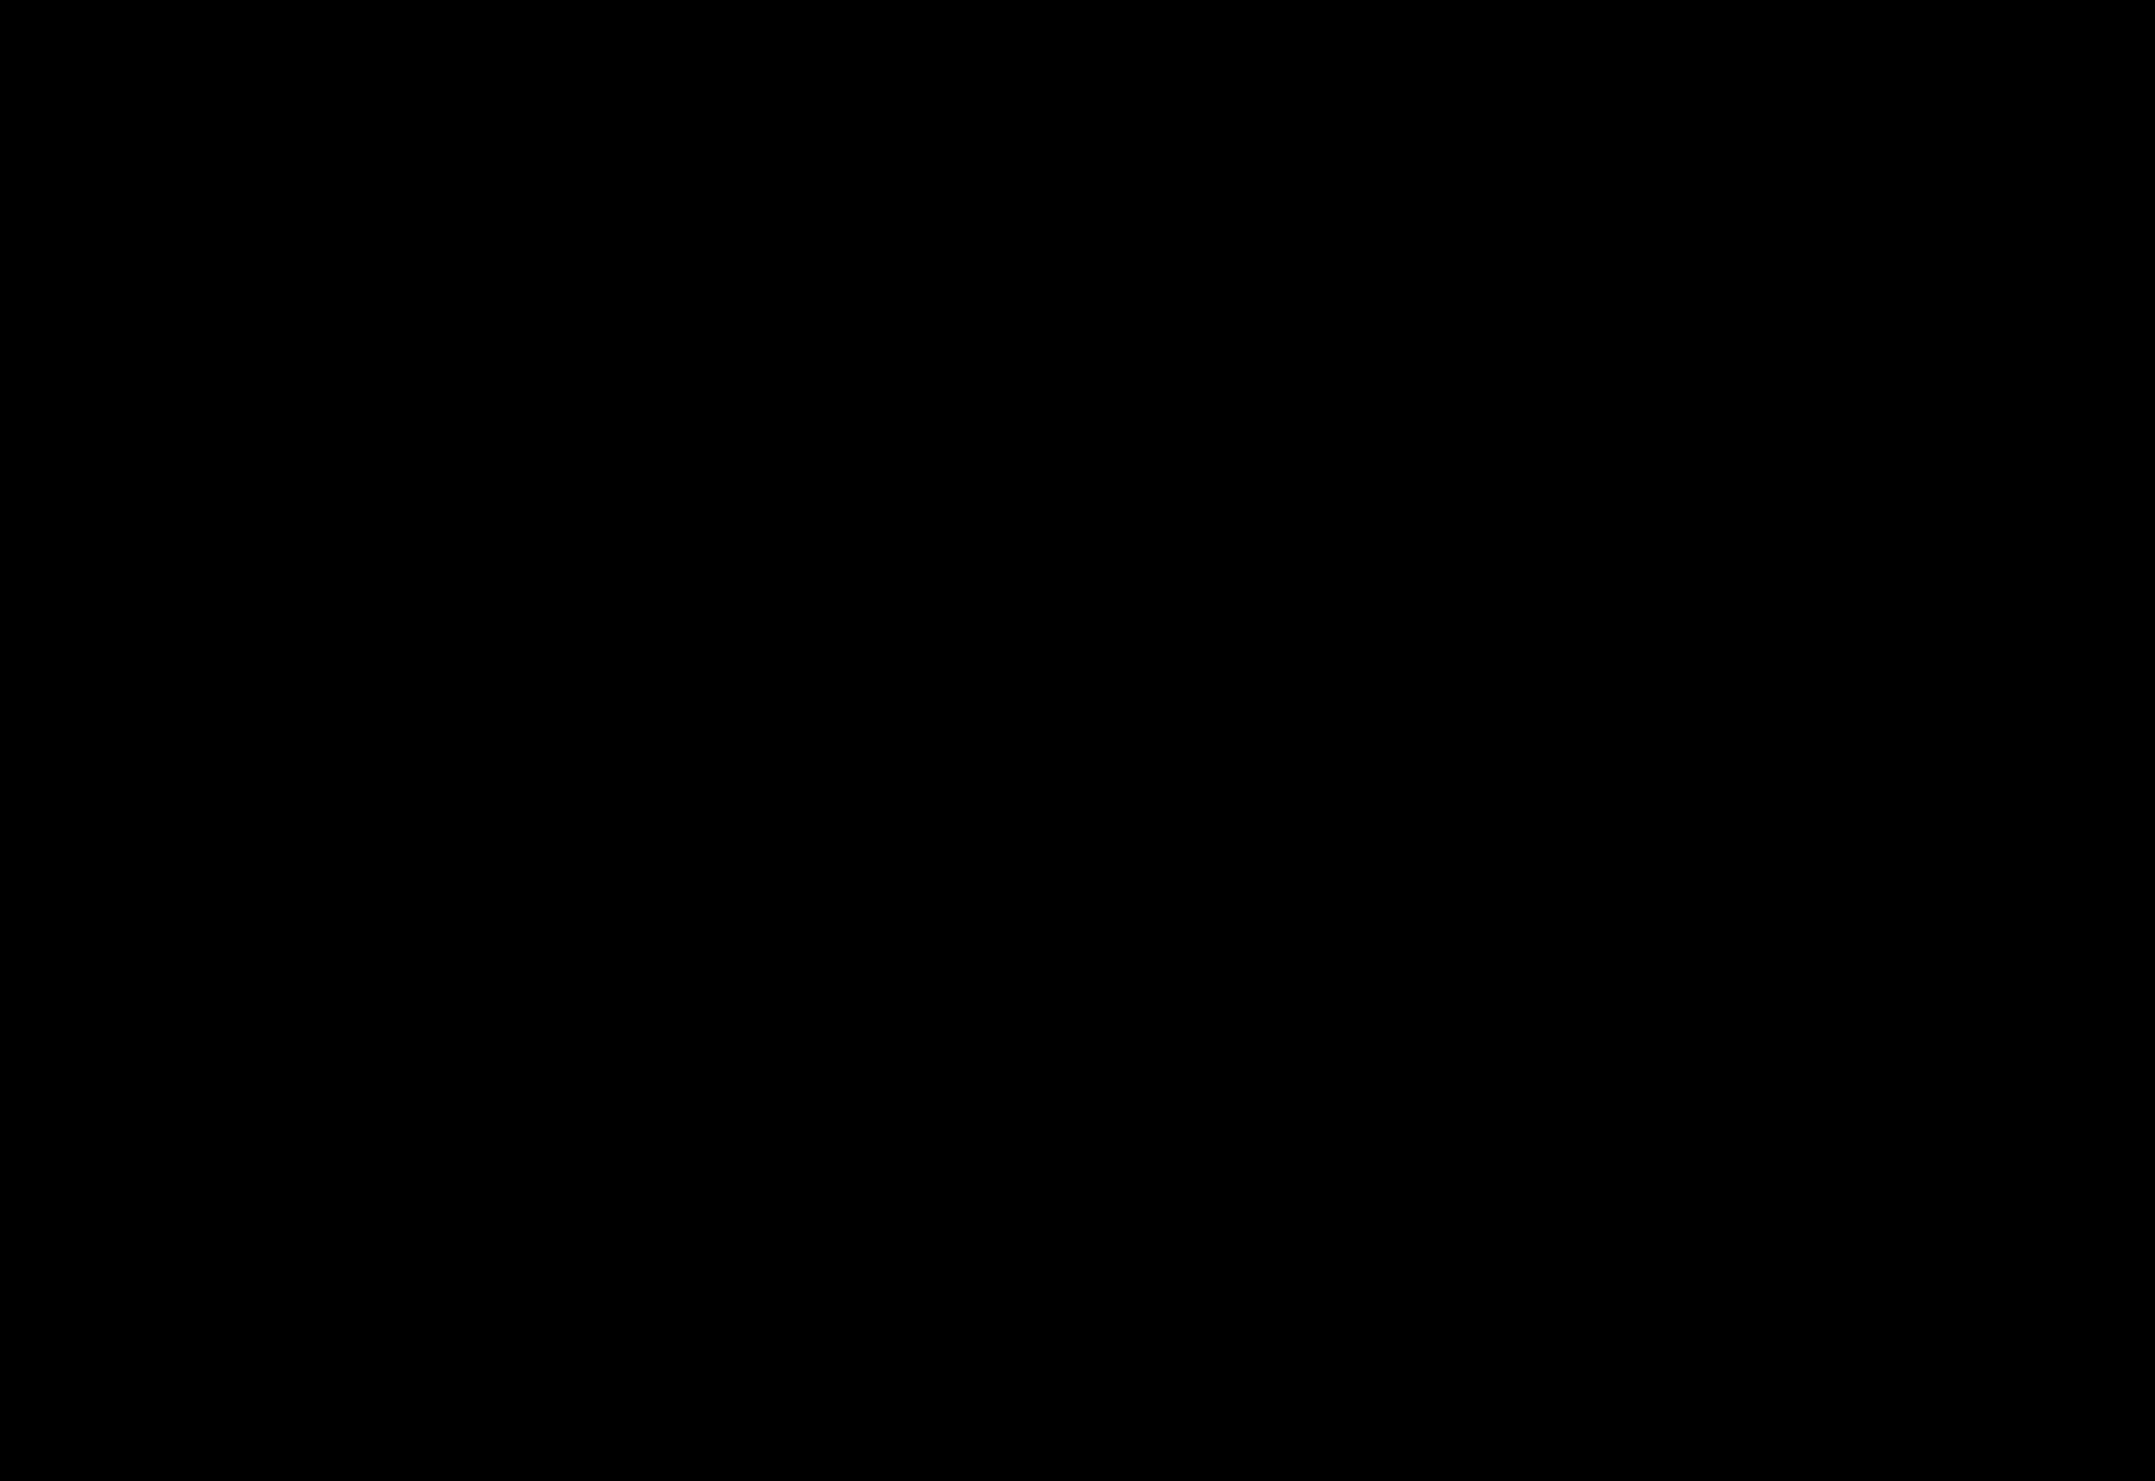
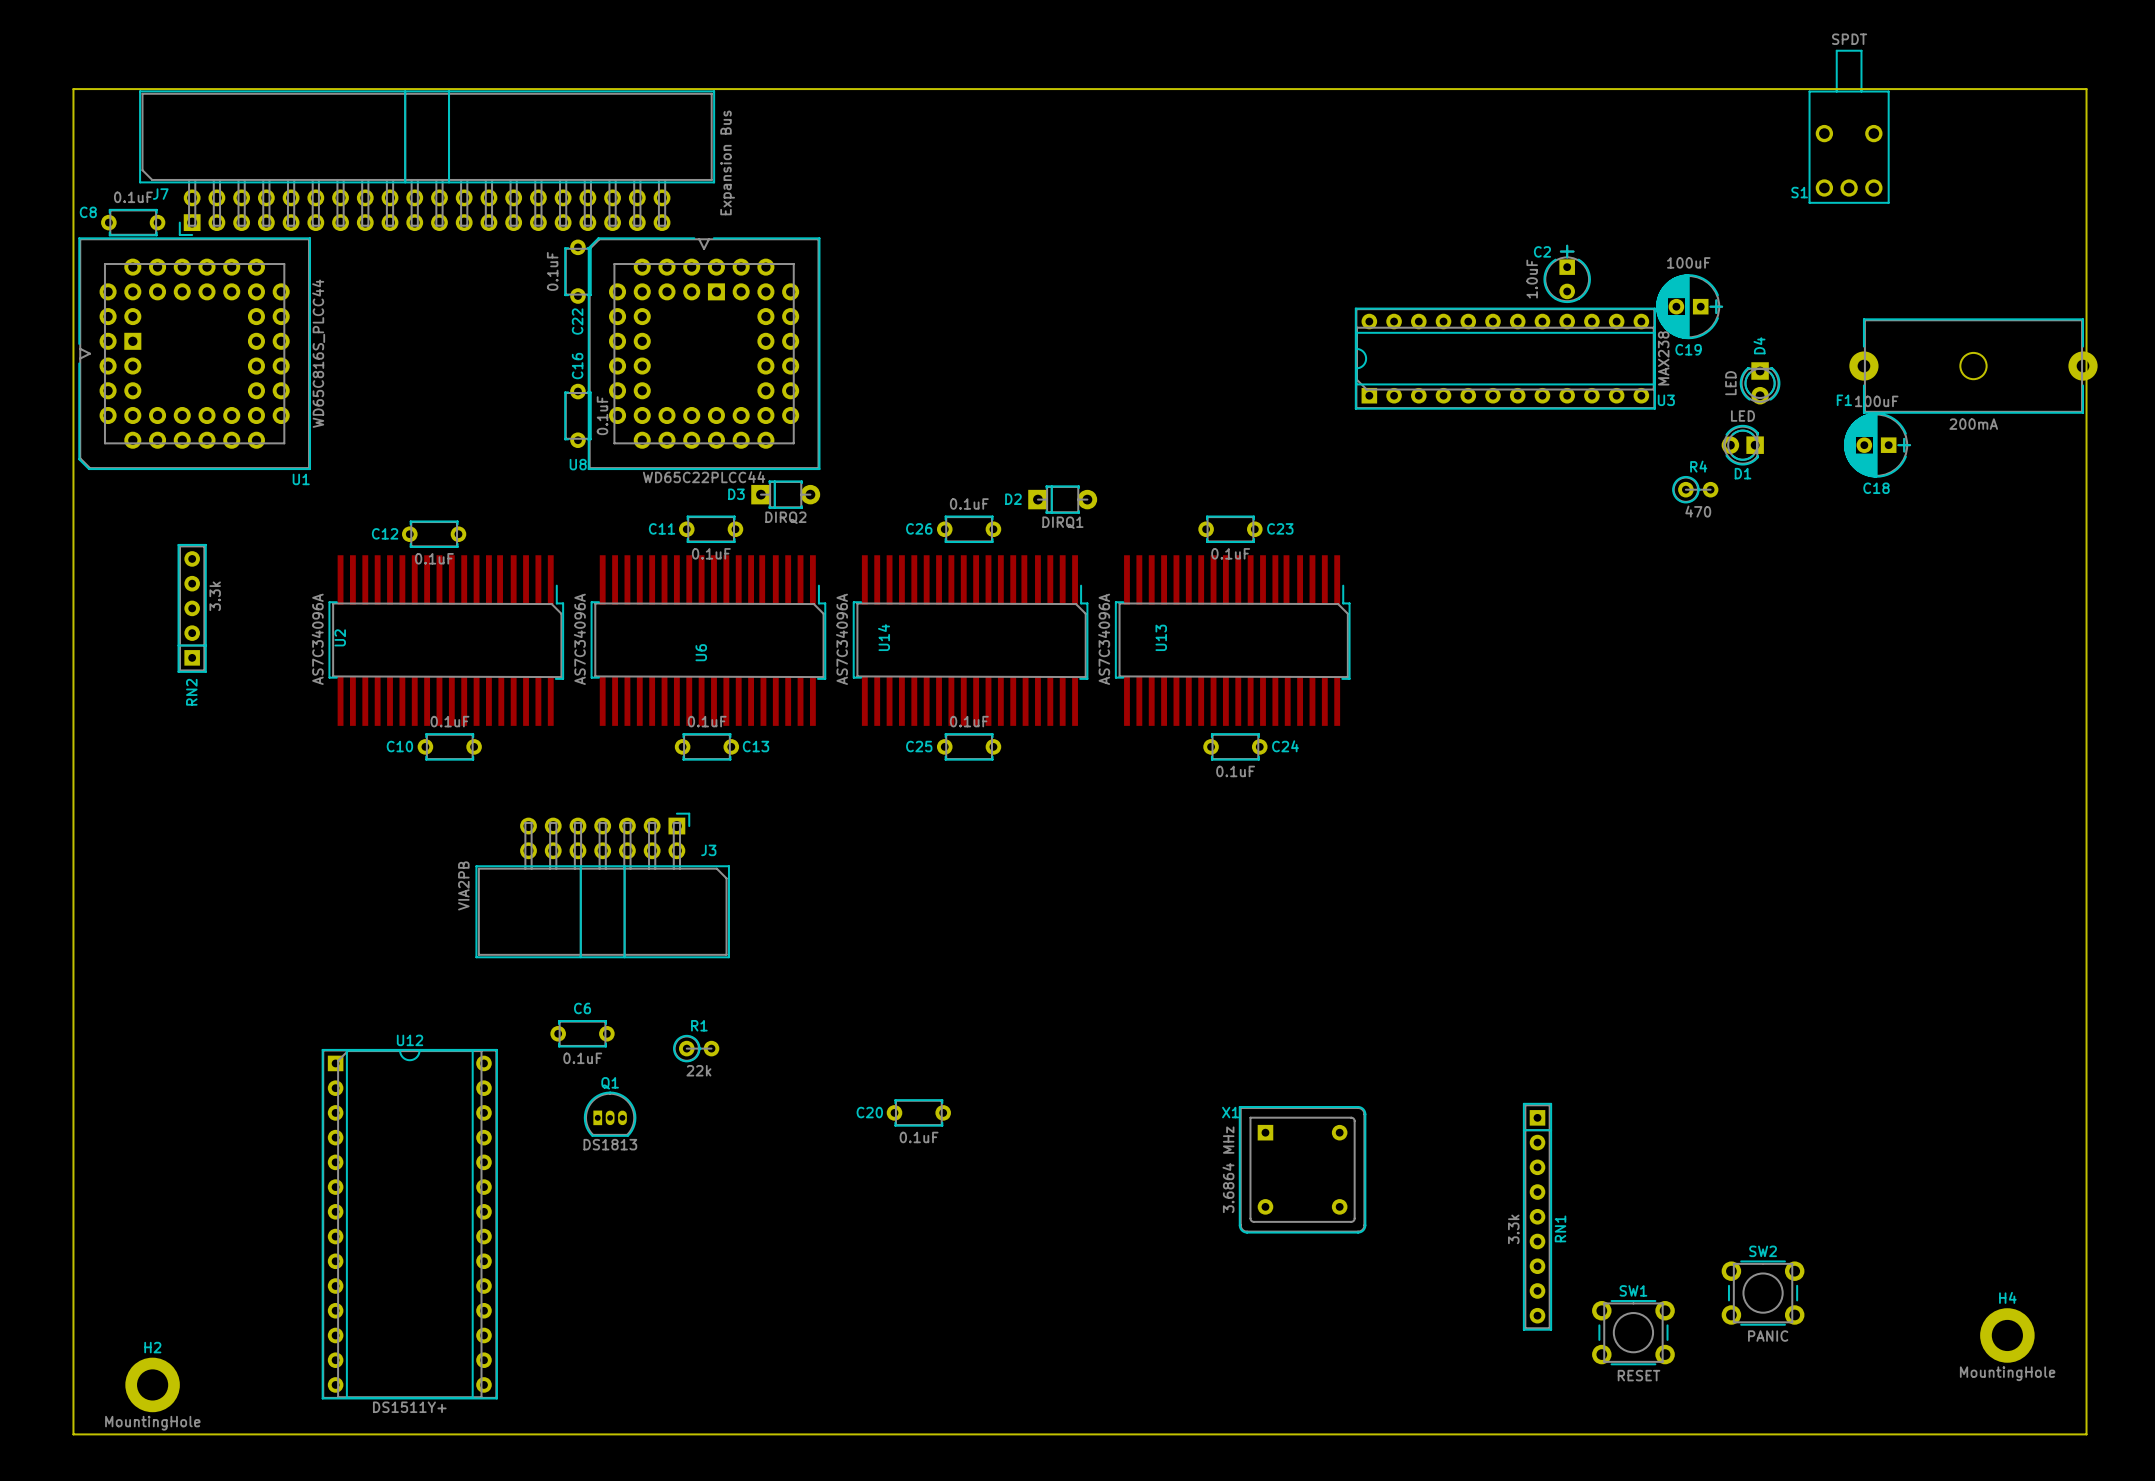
board edge: none -> (73, 89) (73, 1434) (2086, 1434) (2086, 89) (73, 89)
S1: none -> SPDT (1849, 126)
J7: none -> Expansion Bus (427, 163)
C8: none -> 0.1uF (133, 222)
C22: none -> 0.1uF (577, 271)
C2: none -> 1.0uF (1567, 273)
C19: none -> 100uF (1689, 306)
U1: none -> WD65C816S_PLCC44 (194, 353)
U8: none -> WD65C22PLCC44 (704, 353)
U3: none -> MAX238 (1505, 358)
F1: none -> 200mA (1973, 366)
D4: none -> LED (1760, 383)
C16: none -> 0.1uF (577, 415)
D1: none -> LED (1742, 445)
C18: none -> 100uF (1877, 445)
R4: none -> 470 (1695, 489)
D3: none -> DIRQ2 (785, 494)
D2: none -> DIRQ1 (1062, 499)
C11: none -> 0.1uF (711, 529)
C26: none -> 0.1uF (969, 529)
C23: none -> 0.1uF (1230, 529)
C12: none -> 0.1uF (434, 534)
RN2: none -> 3.3k (192, 608)
U2: none -> AS7C34096A (446, 640)
U6: none -> AS7C34096A (708, 640)
U14: none -> AS7C34096A (970, 640)
U13: none -> AS7C34096A (1232, 640)
C10: none -> 0.1uF (449, 746)
C13: none -> 0.1uF (706, 746)
C25: none -> 0.1uF (969, 746)
C24: none -> 0.1uF (1235, 746)
J3: none -> VIA2PB (602, 885)
C6: none -> 0.1uF (582, 1033)
R1: none -> 22k (696, 1048)
C20: none -> 0.1uF (918, 1112)
Q1: none -> DS1813 (610, 1114)
X1: none -> 3.6864 MHz (1302, 1169)
RN1: none -> 3.3k (1537, 1216)
U12: none -> DS1511Y+ (409, 1224)
SW2: none -> PANIC (1763, 1293)
SW1: none -> RESET (1633, 1332)
H4: none -> MountingHole (2007, 1335)
H2: none -> MountingHole (152, 1384)

